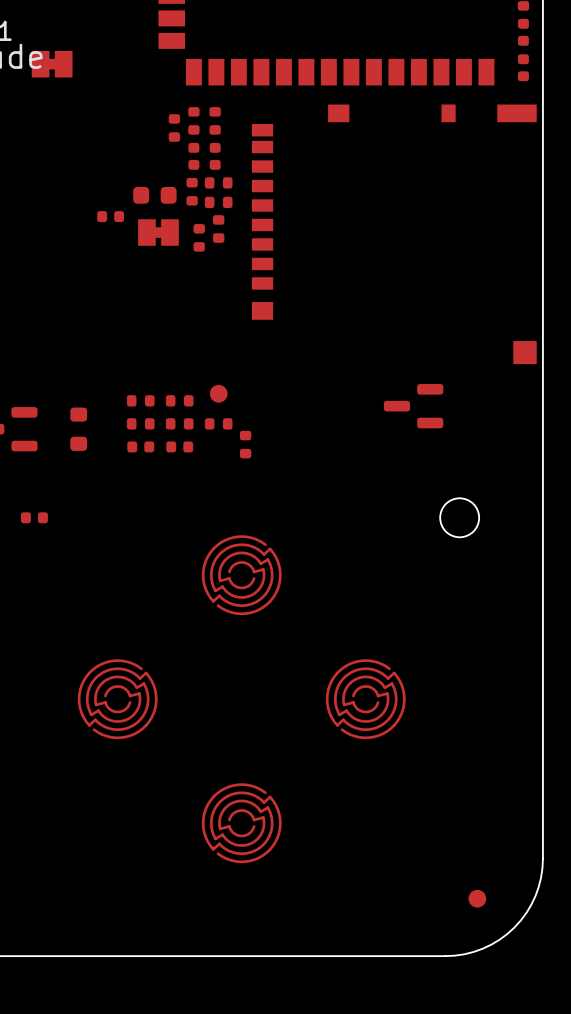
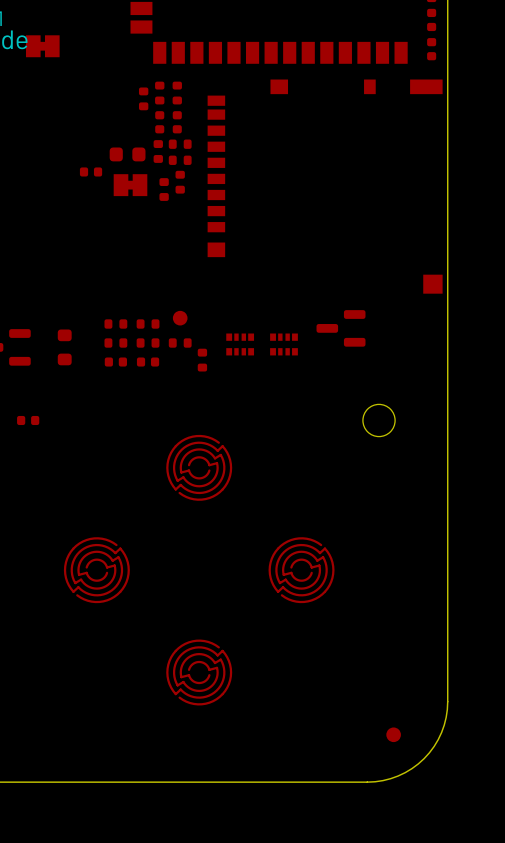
part: none -> (240, 344)
part: none -> (283, 344)

